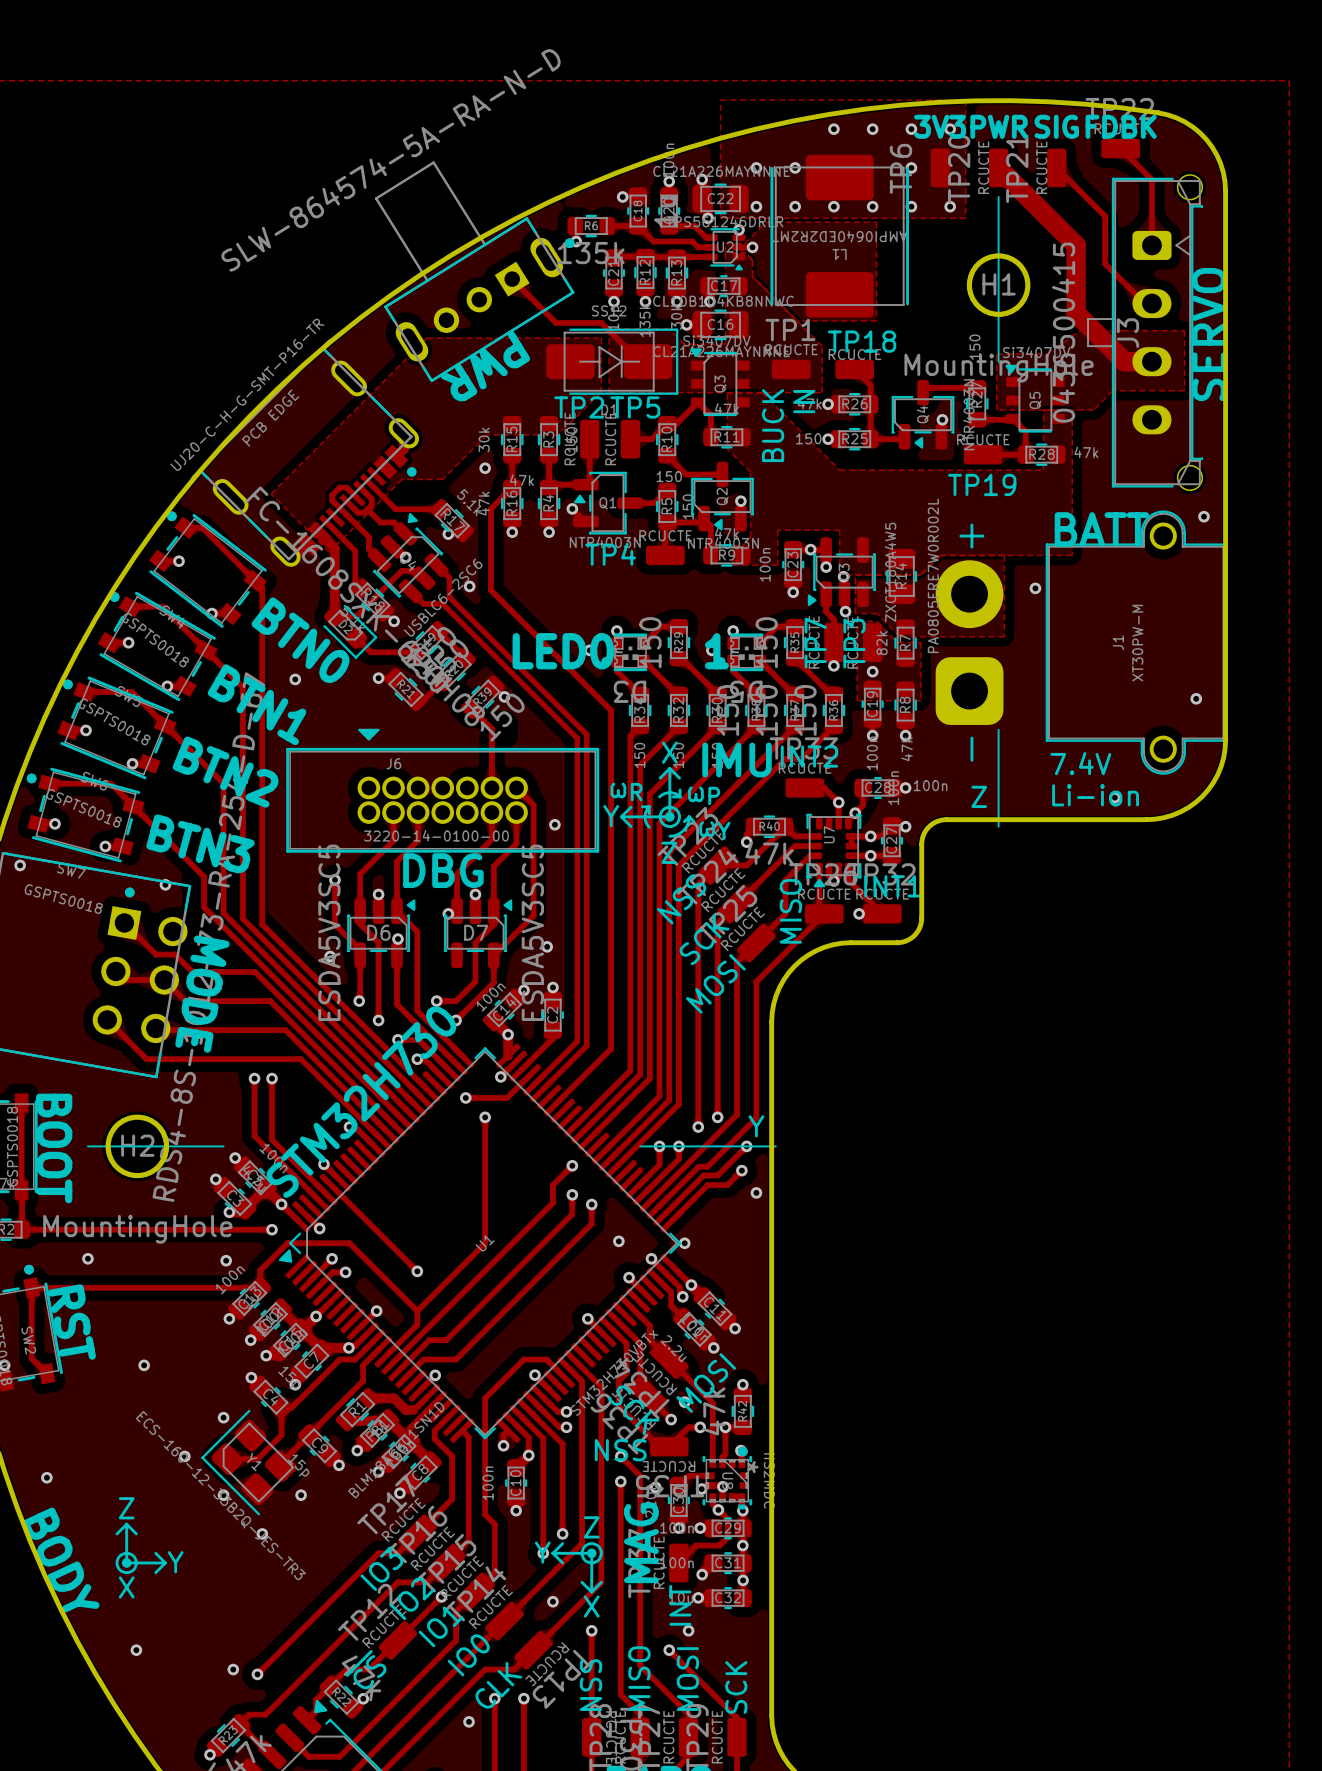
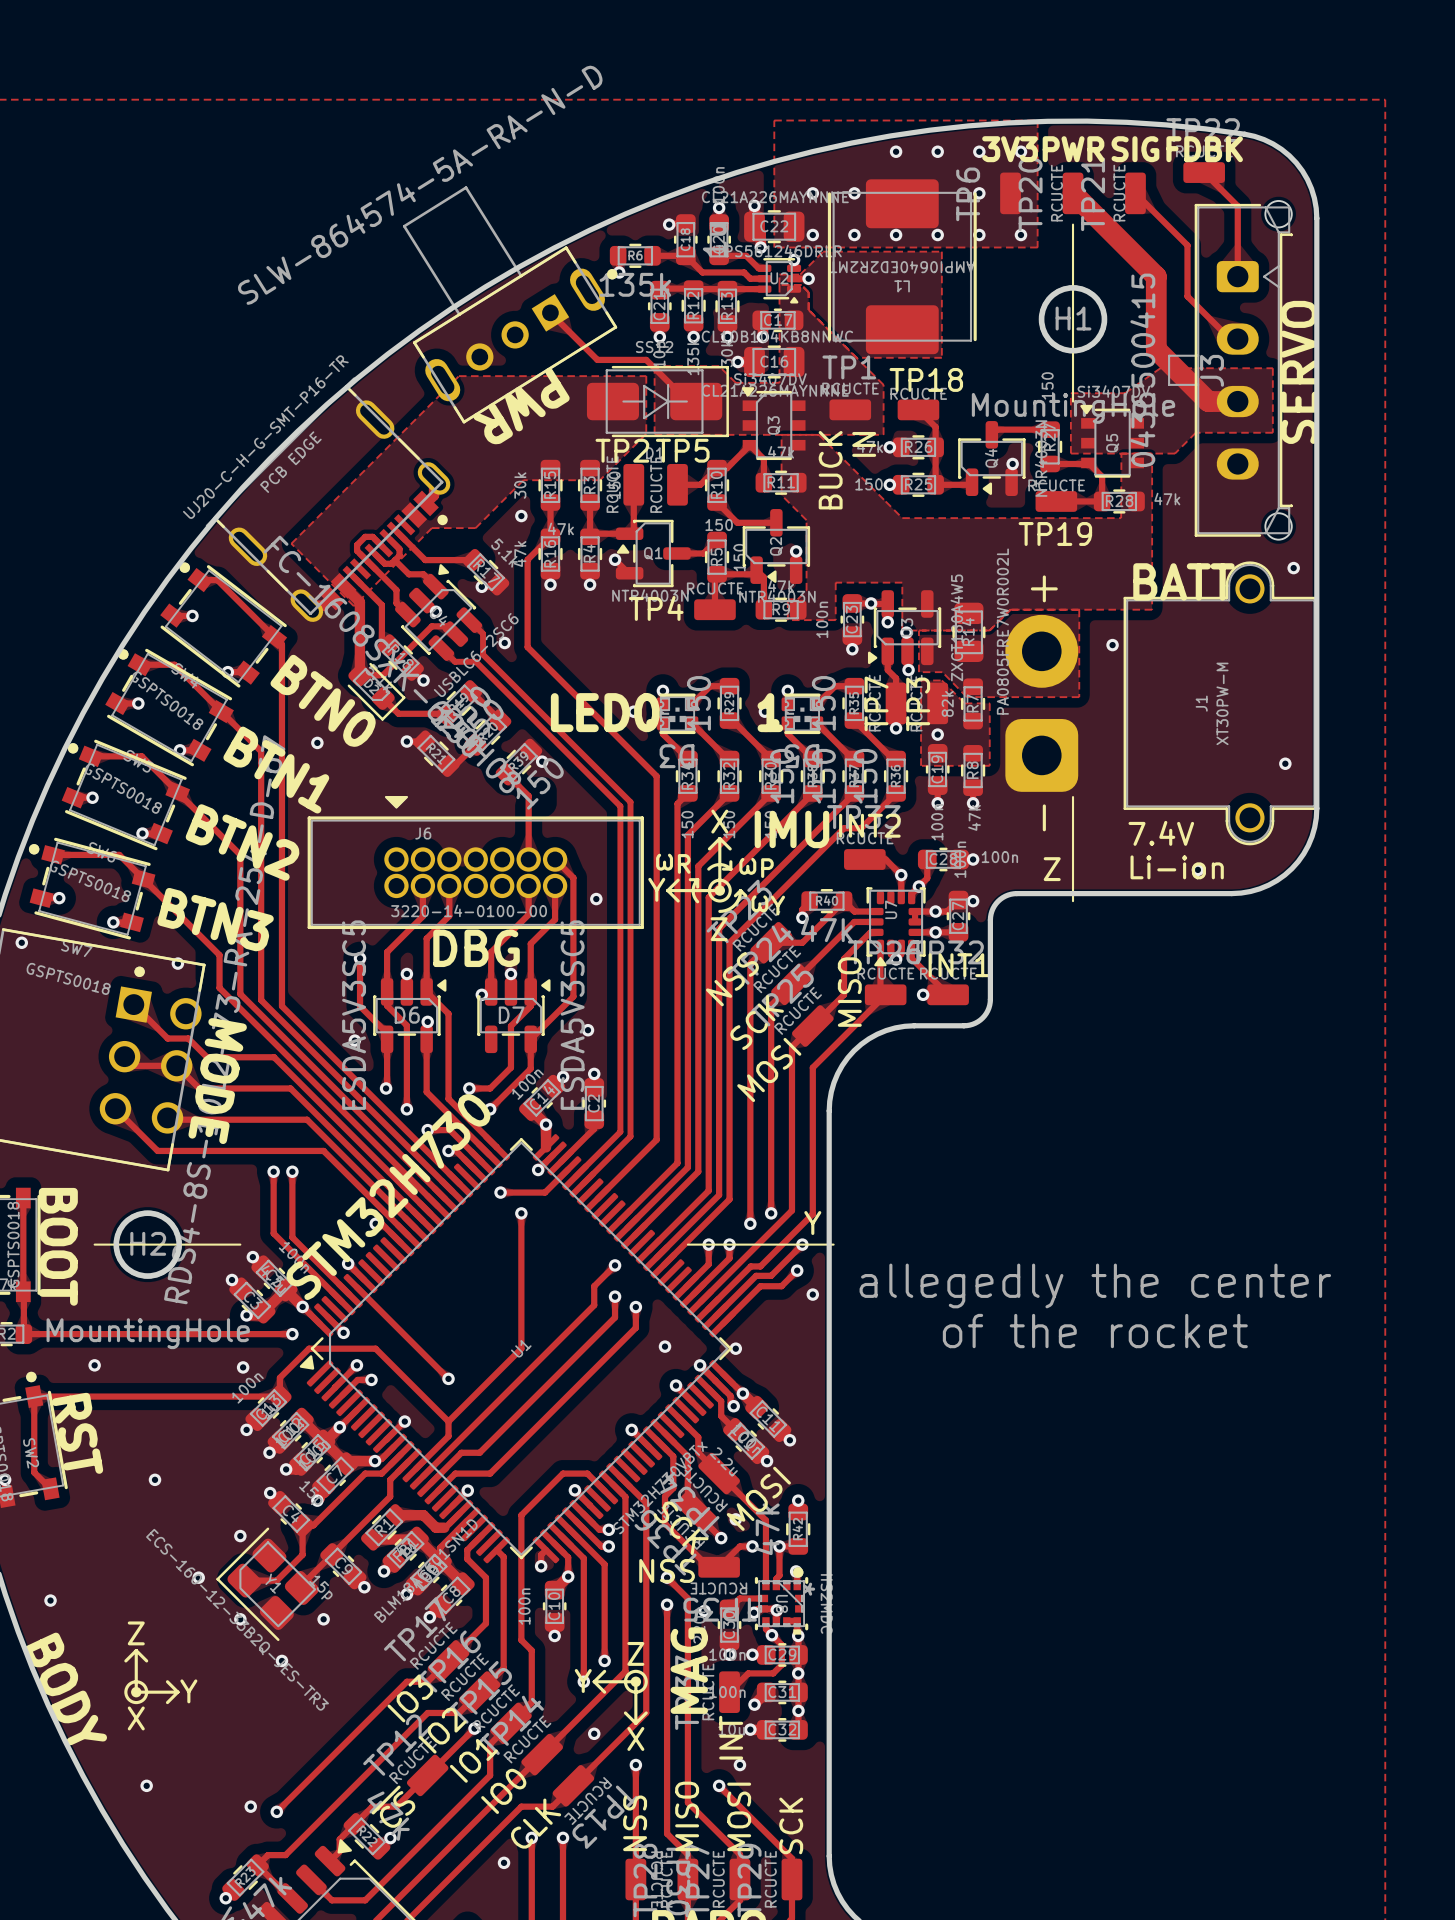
text: none -> allegedly the center (1095, 1285)
text: none -> of the rocket (1095, 1331)

